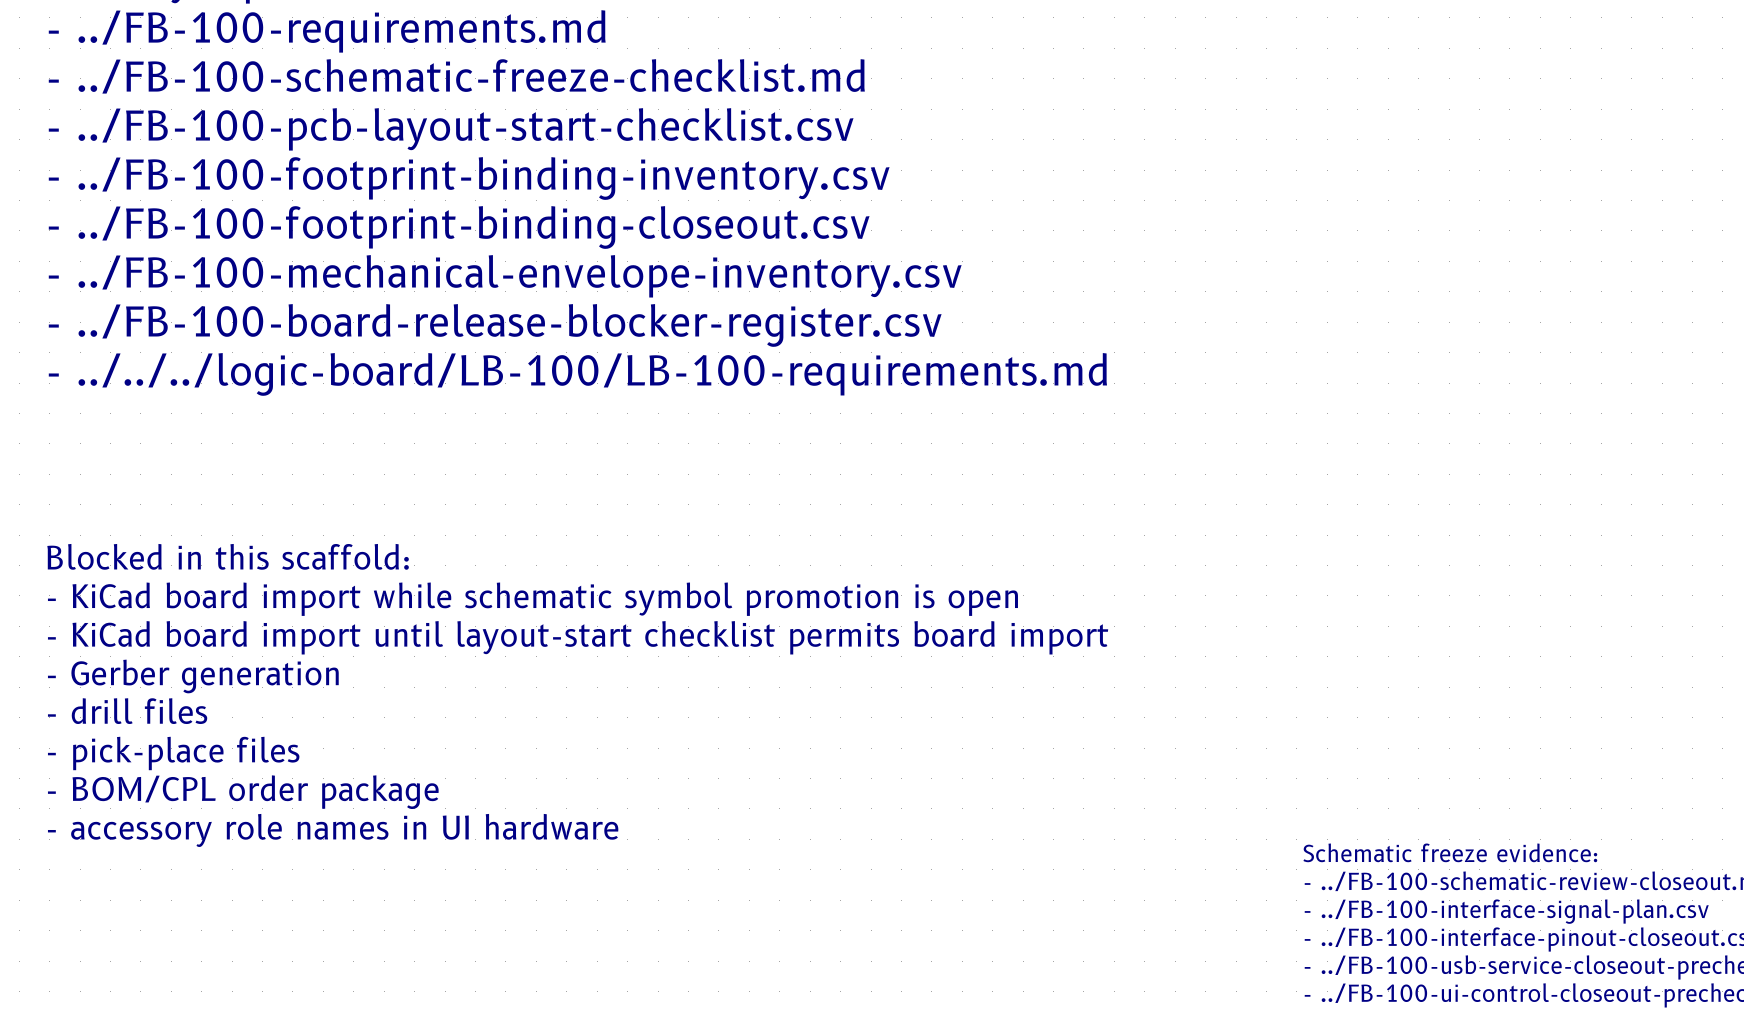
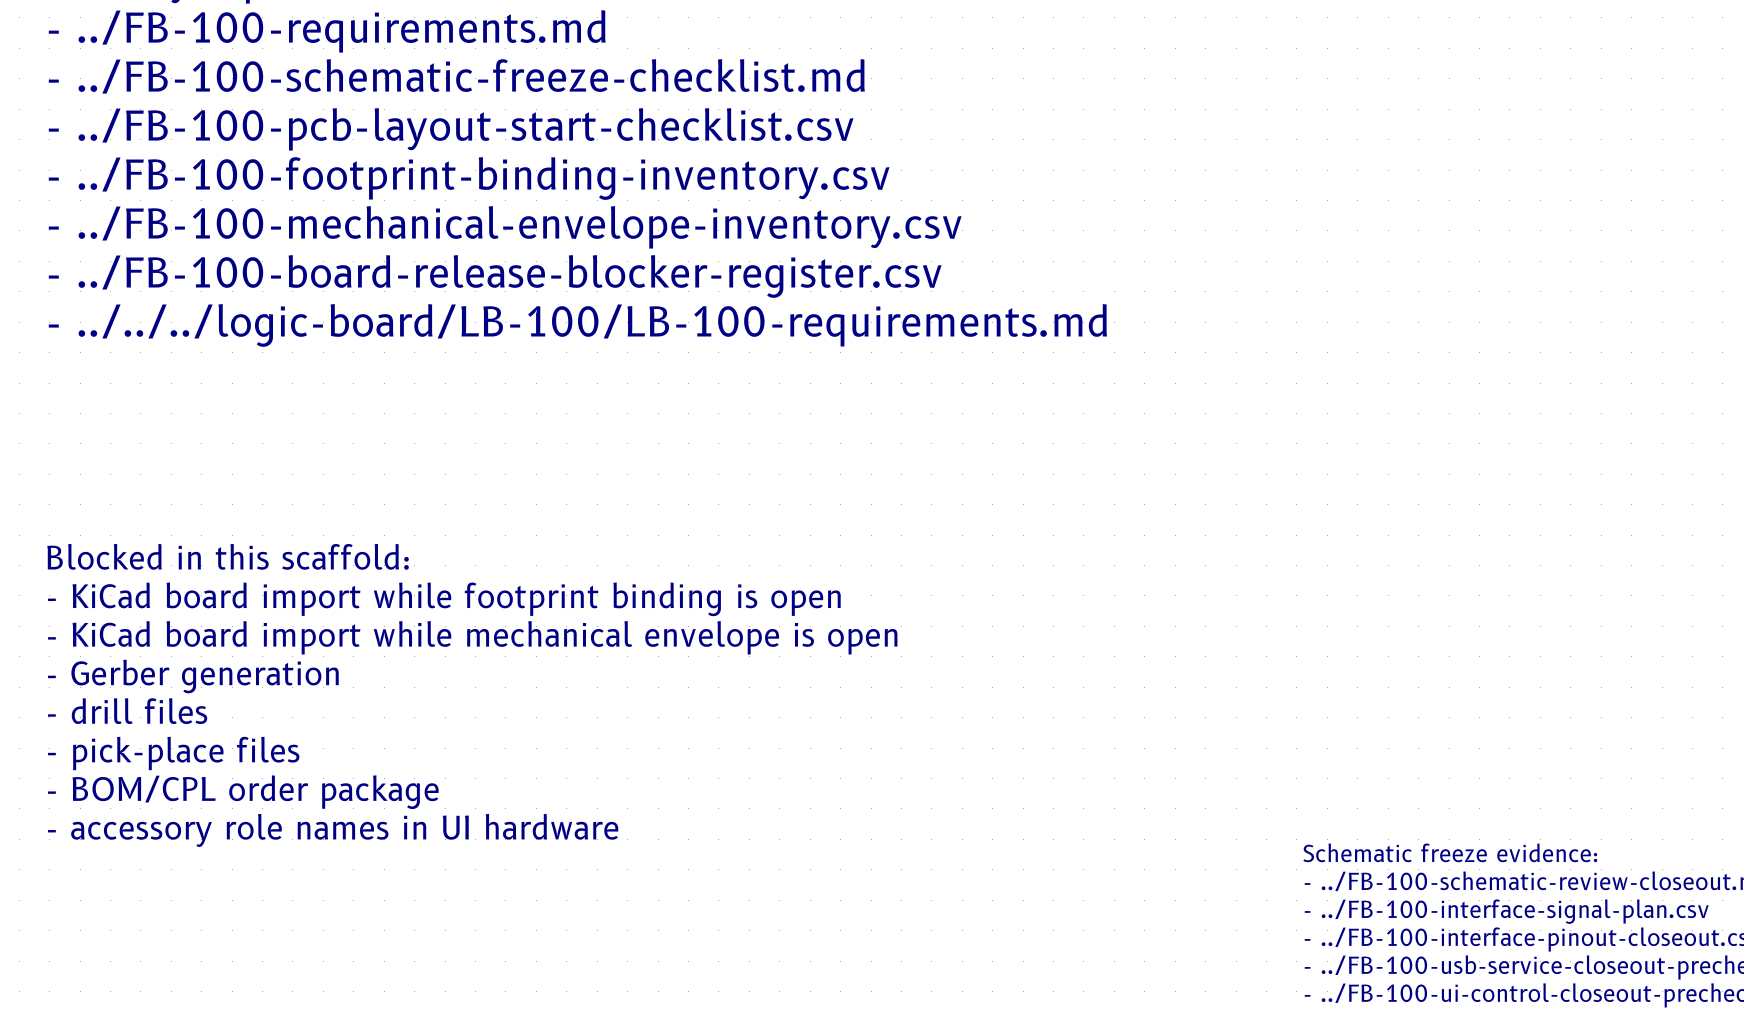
text: - ../FB-100-footprint-binding-closeout.csv (459, 227) -> - ../FB-100-mechanical-envelope-inventory.csv (505, 227)
text: - ../FB-100-mechanical-envelope-inventory.csv (505, 276) -> - ../FB-100-board-release-blocker-register.csv (495, 276)
text: - ../FB-100-board-release-blocker-register.csv (495, 325) -> - ../../../logic-board/LB-100/LB-100-requirements.md (577, 325)
text: - ../../../logic-board/LB-100/LB-100-requirements.md (577, 374) -> none
text: - KiCad board import while schematic symbol promotion is open (532, 599) -> - KiCad board import while footprint binding is open (444, 599)
text: - KiCad board import until layout-start checklist permits board import (578, 637) -> - KiCad board import while mechanical envelope is open (472, 637)

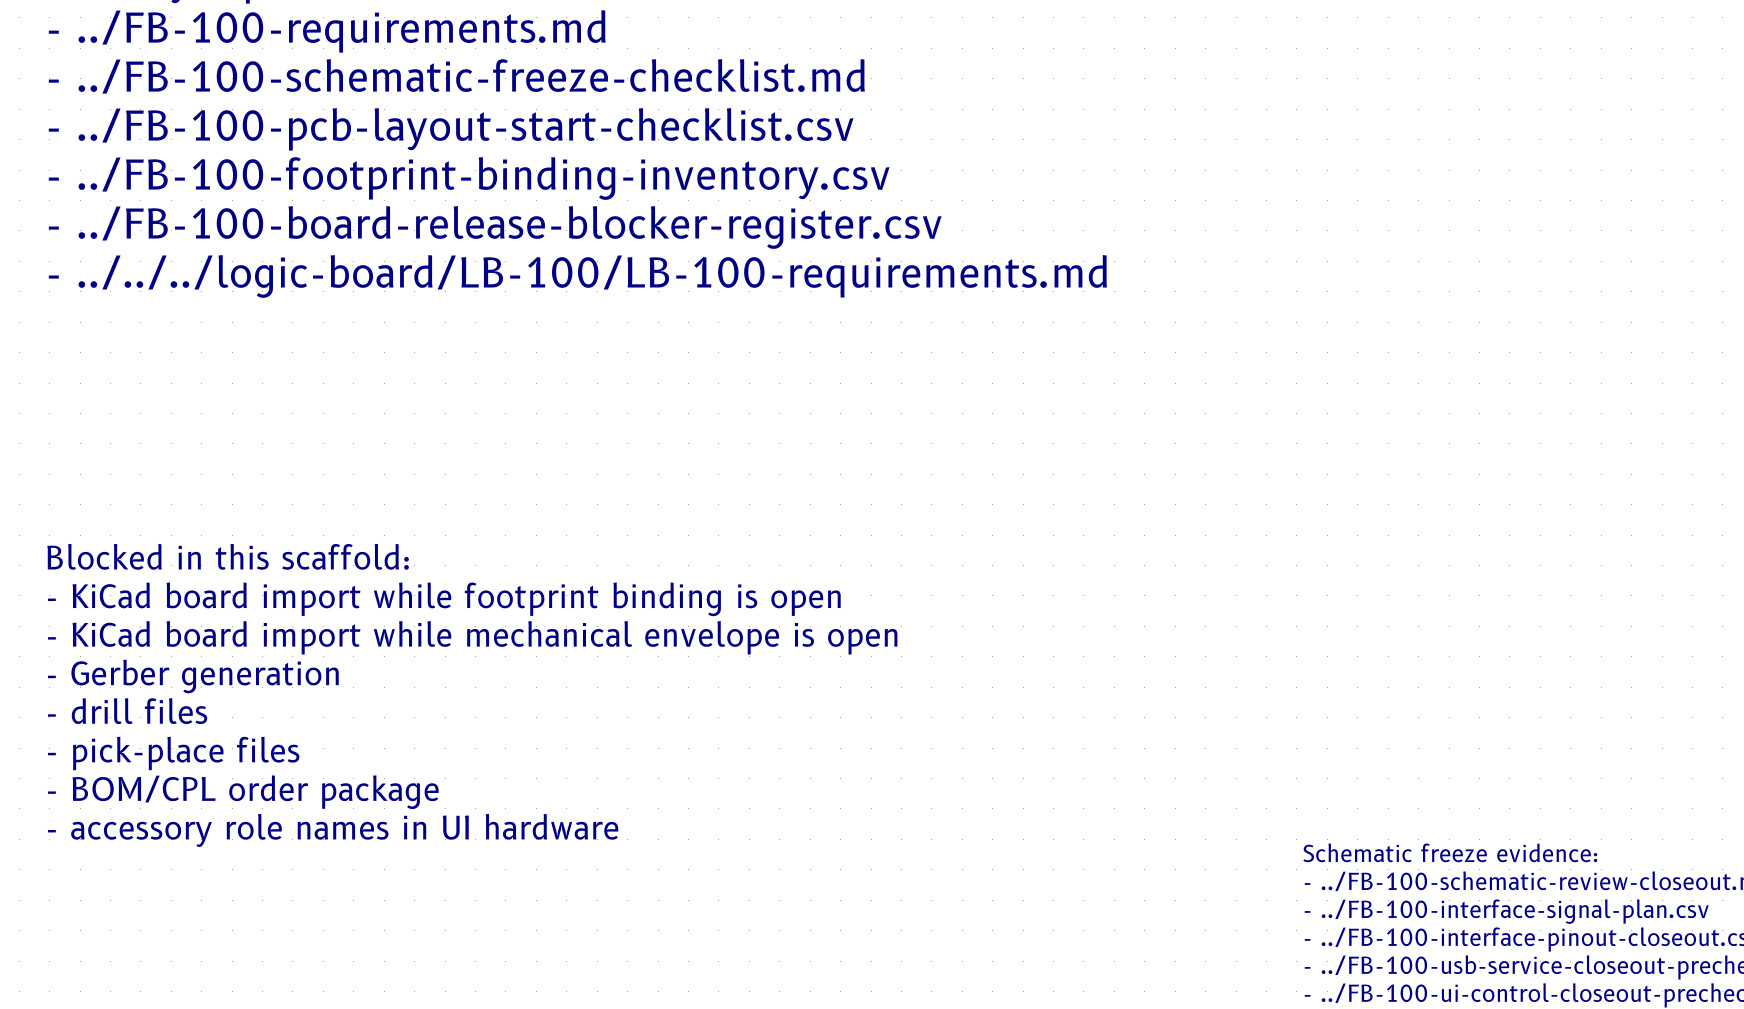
text: - ../FB-100-mechanical-envelope-inventory.csv (505, 227) -> - ../FB-100-board-release-blocker-register.csv (495, 227)
text: - ../FB-100-board-release-blocker-register.csv (495, 276) -> - ../../../logic-board/LB-100/LB-100-requirements.md (577, 276)
text: - ../../../logic-board/LB-100/LB-100-requirements.md (577, 325) -> none

